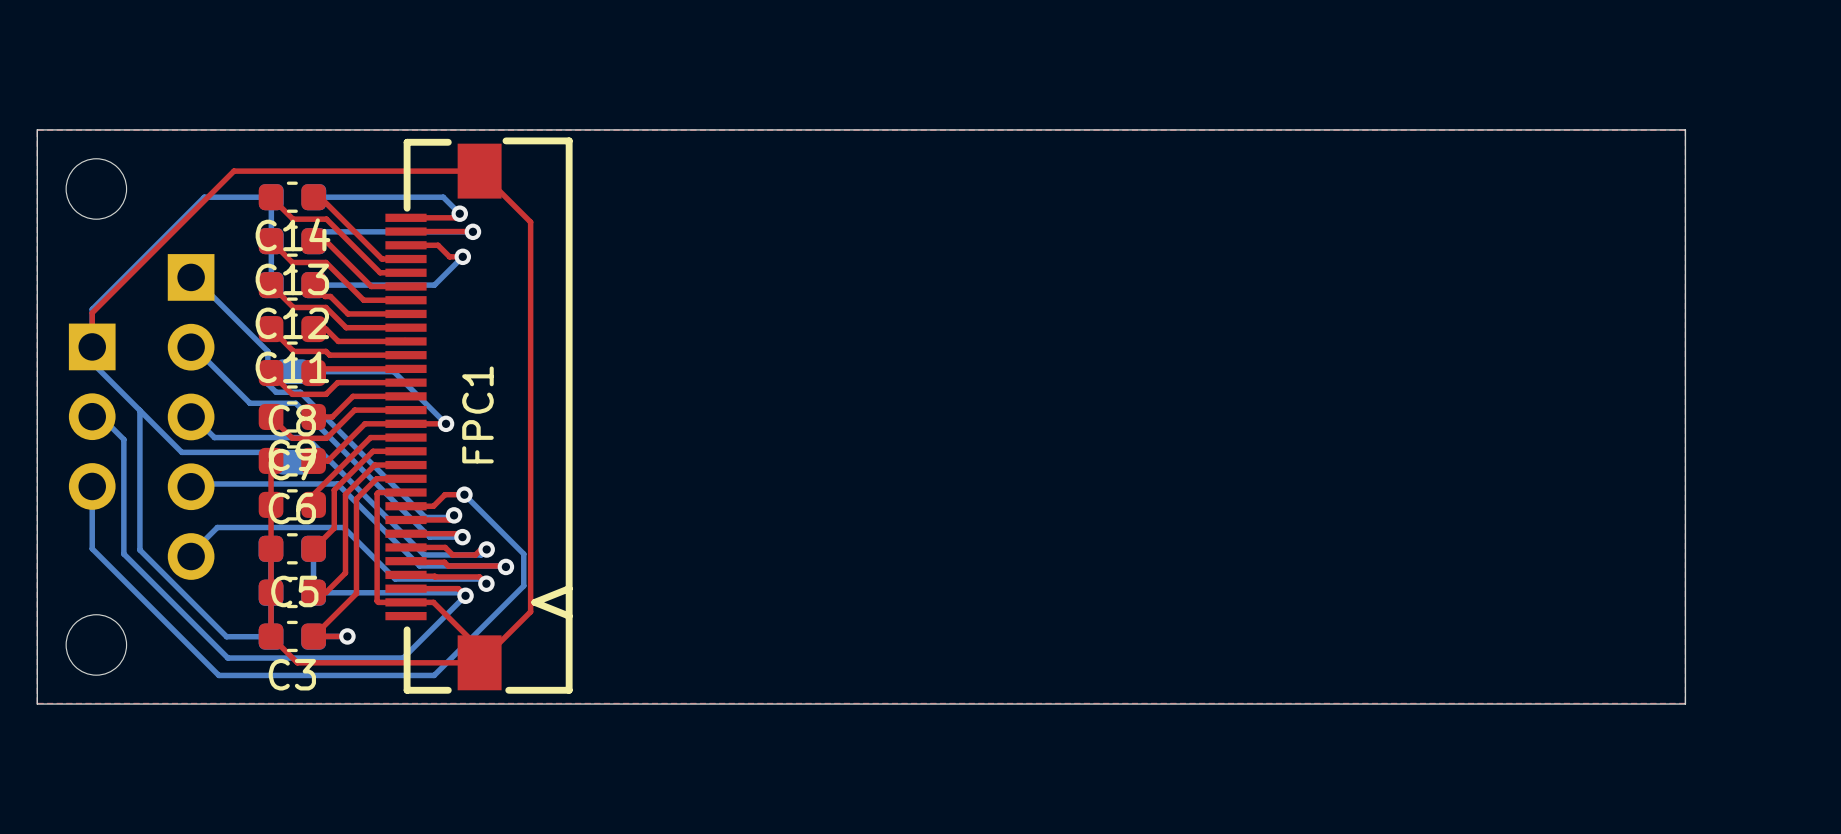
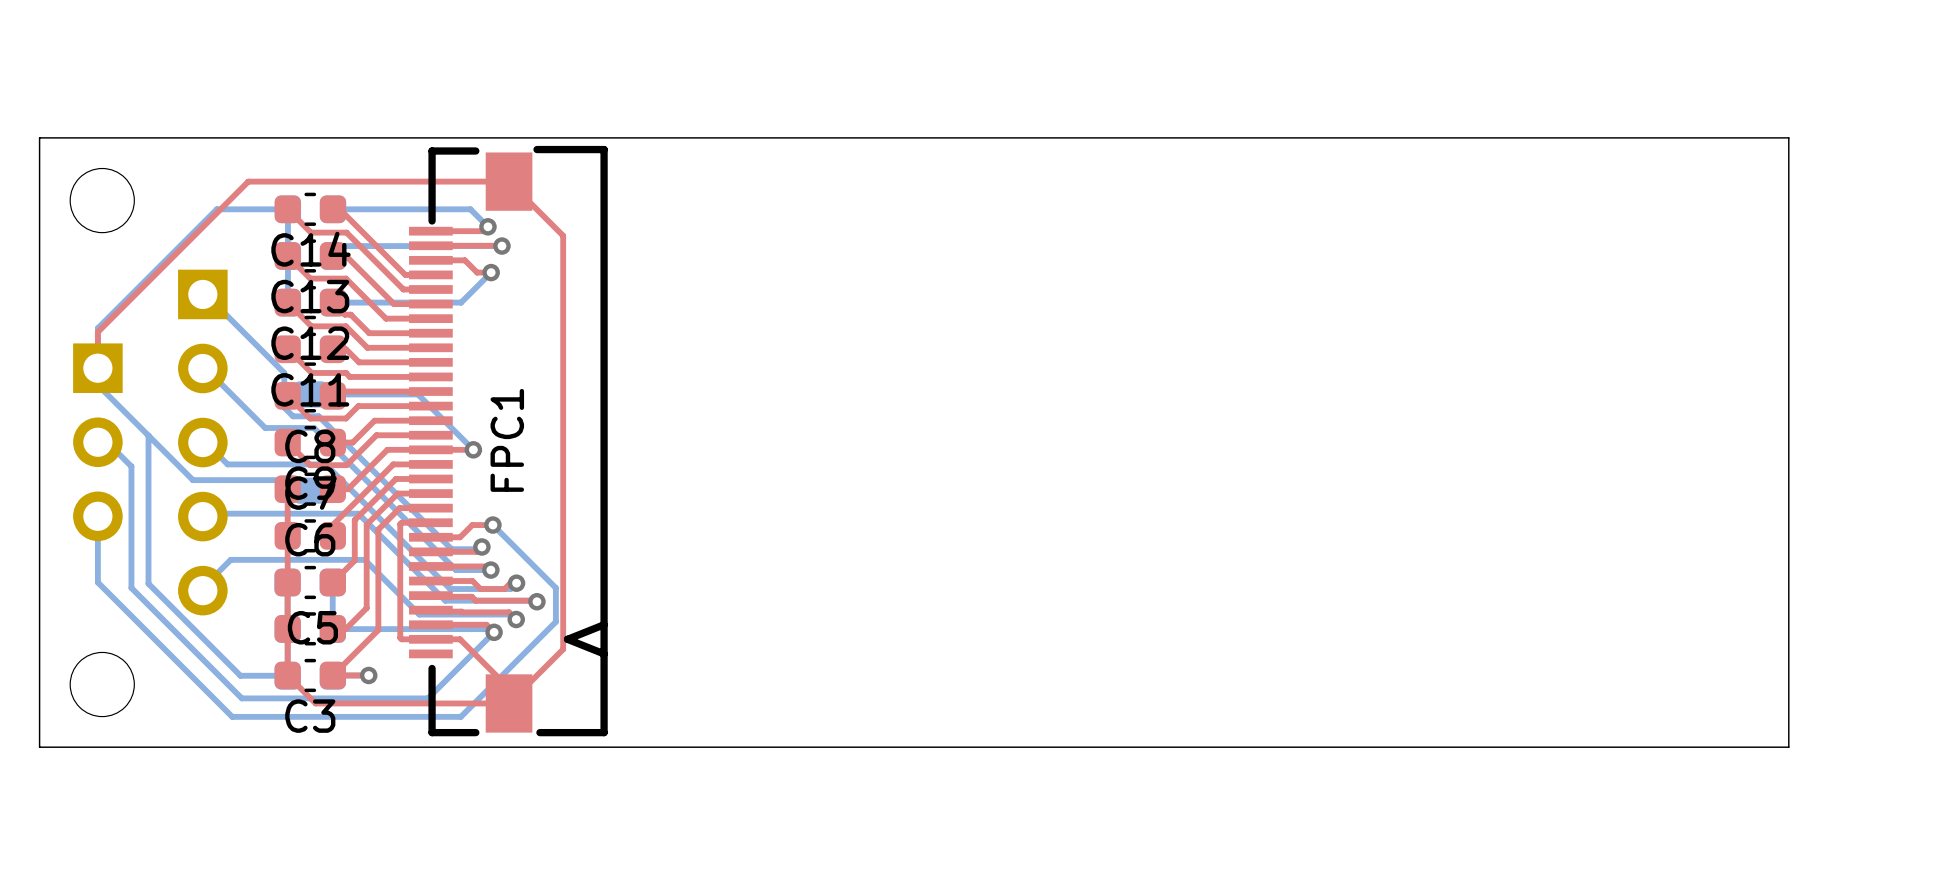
top zone outline: (37, 130) (1685, 130) (1685, 703) -> none
top zone outline: (37, 130) (37, 703) (1685, 703) -> none

